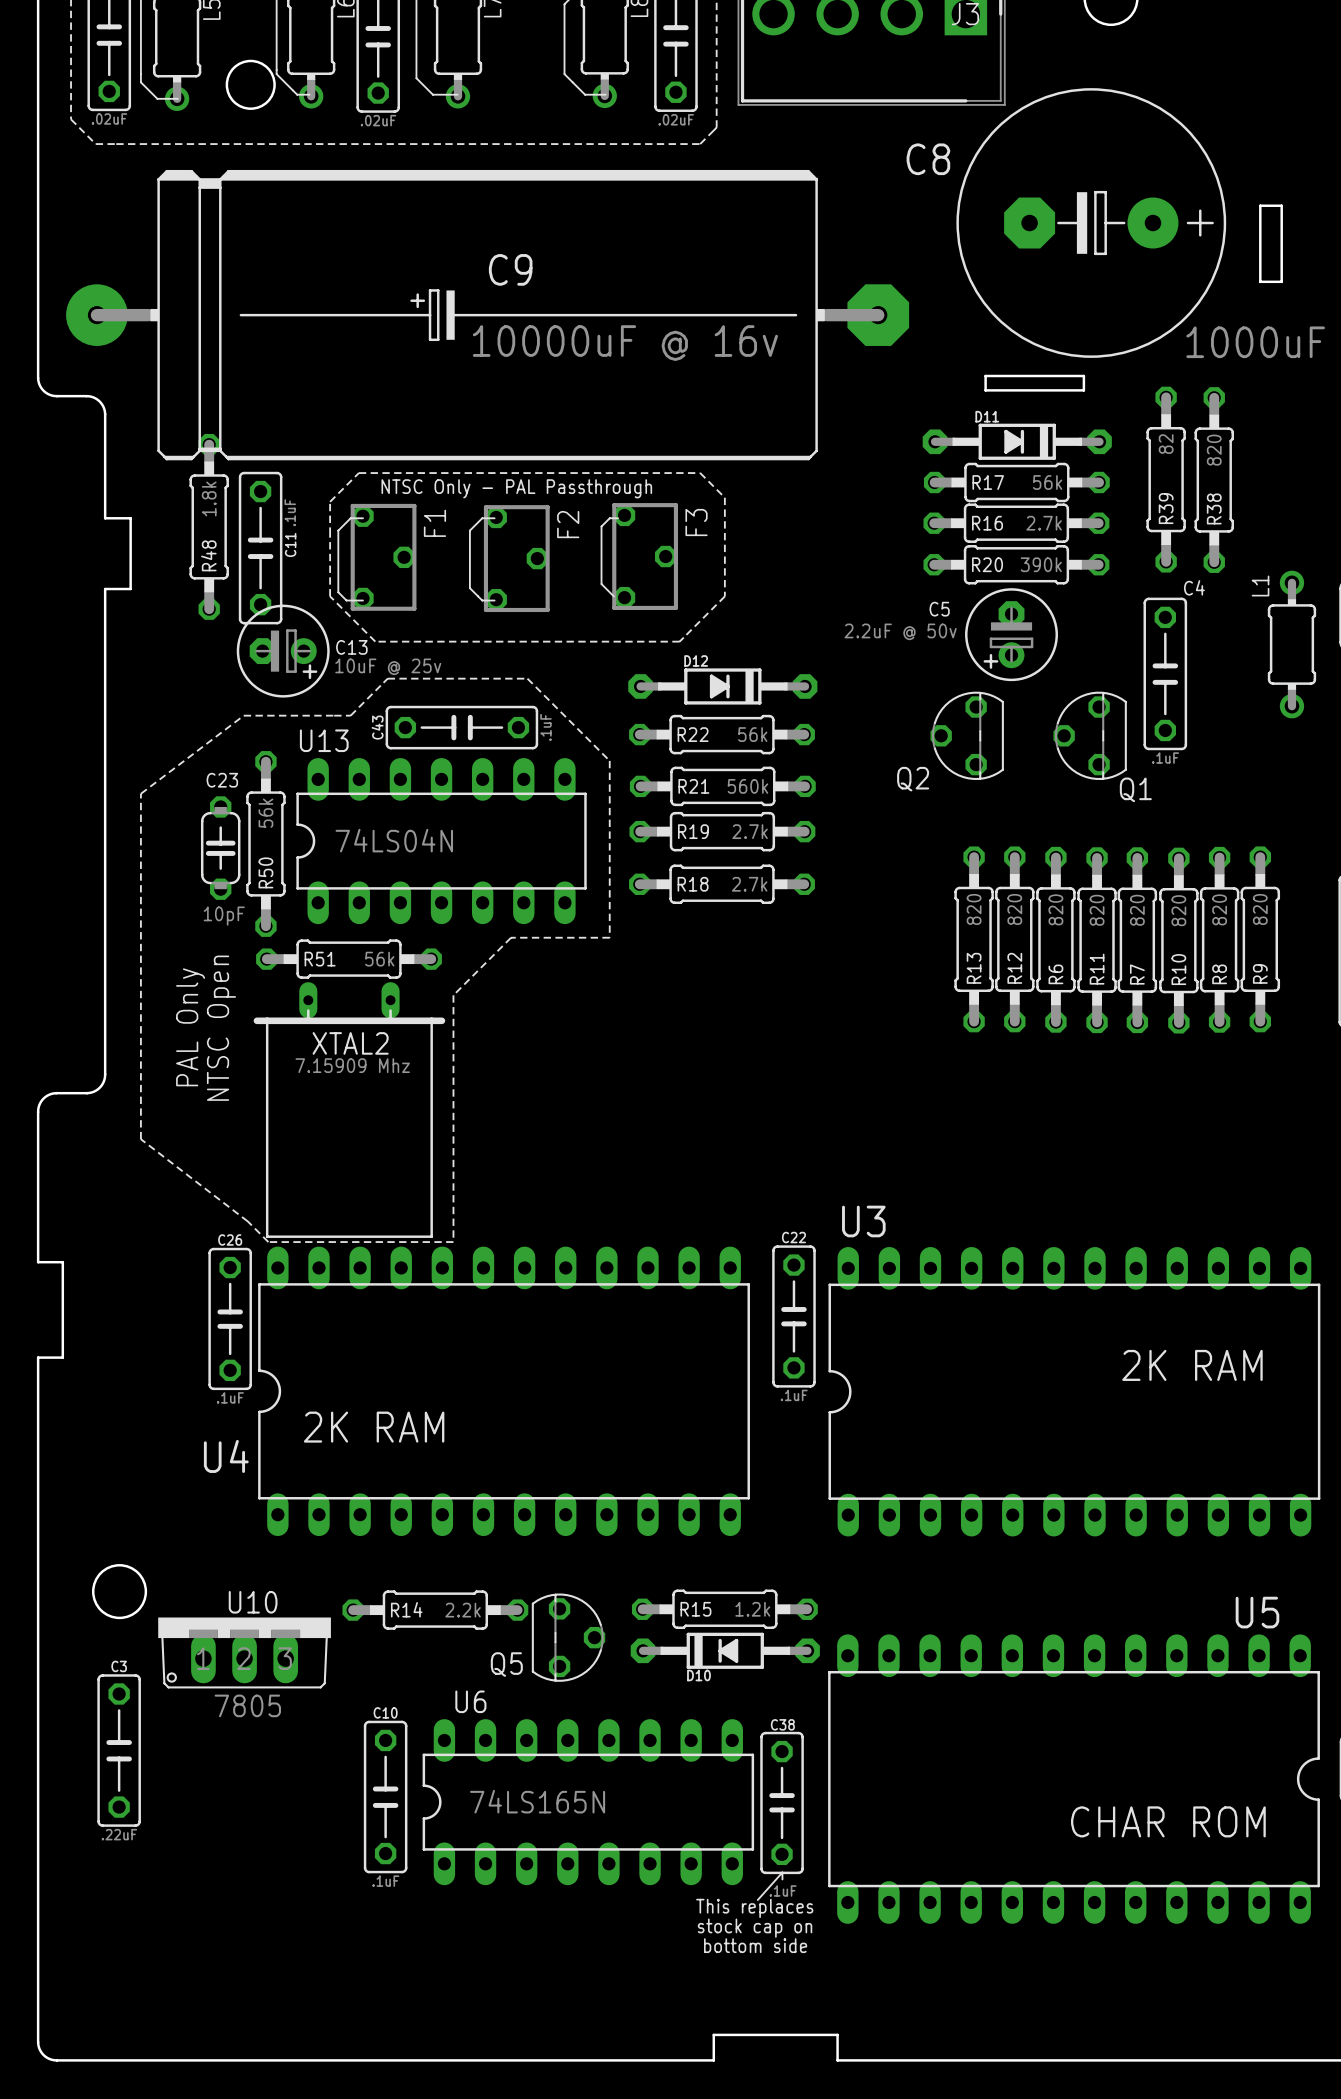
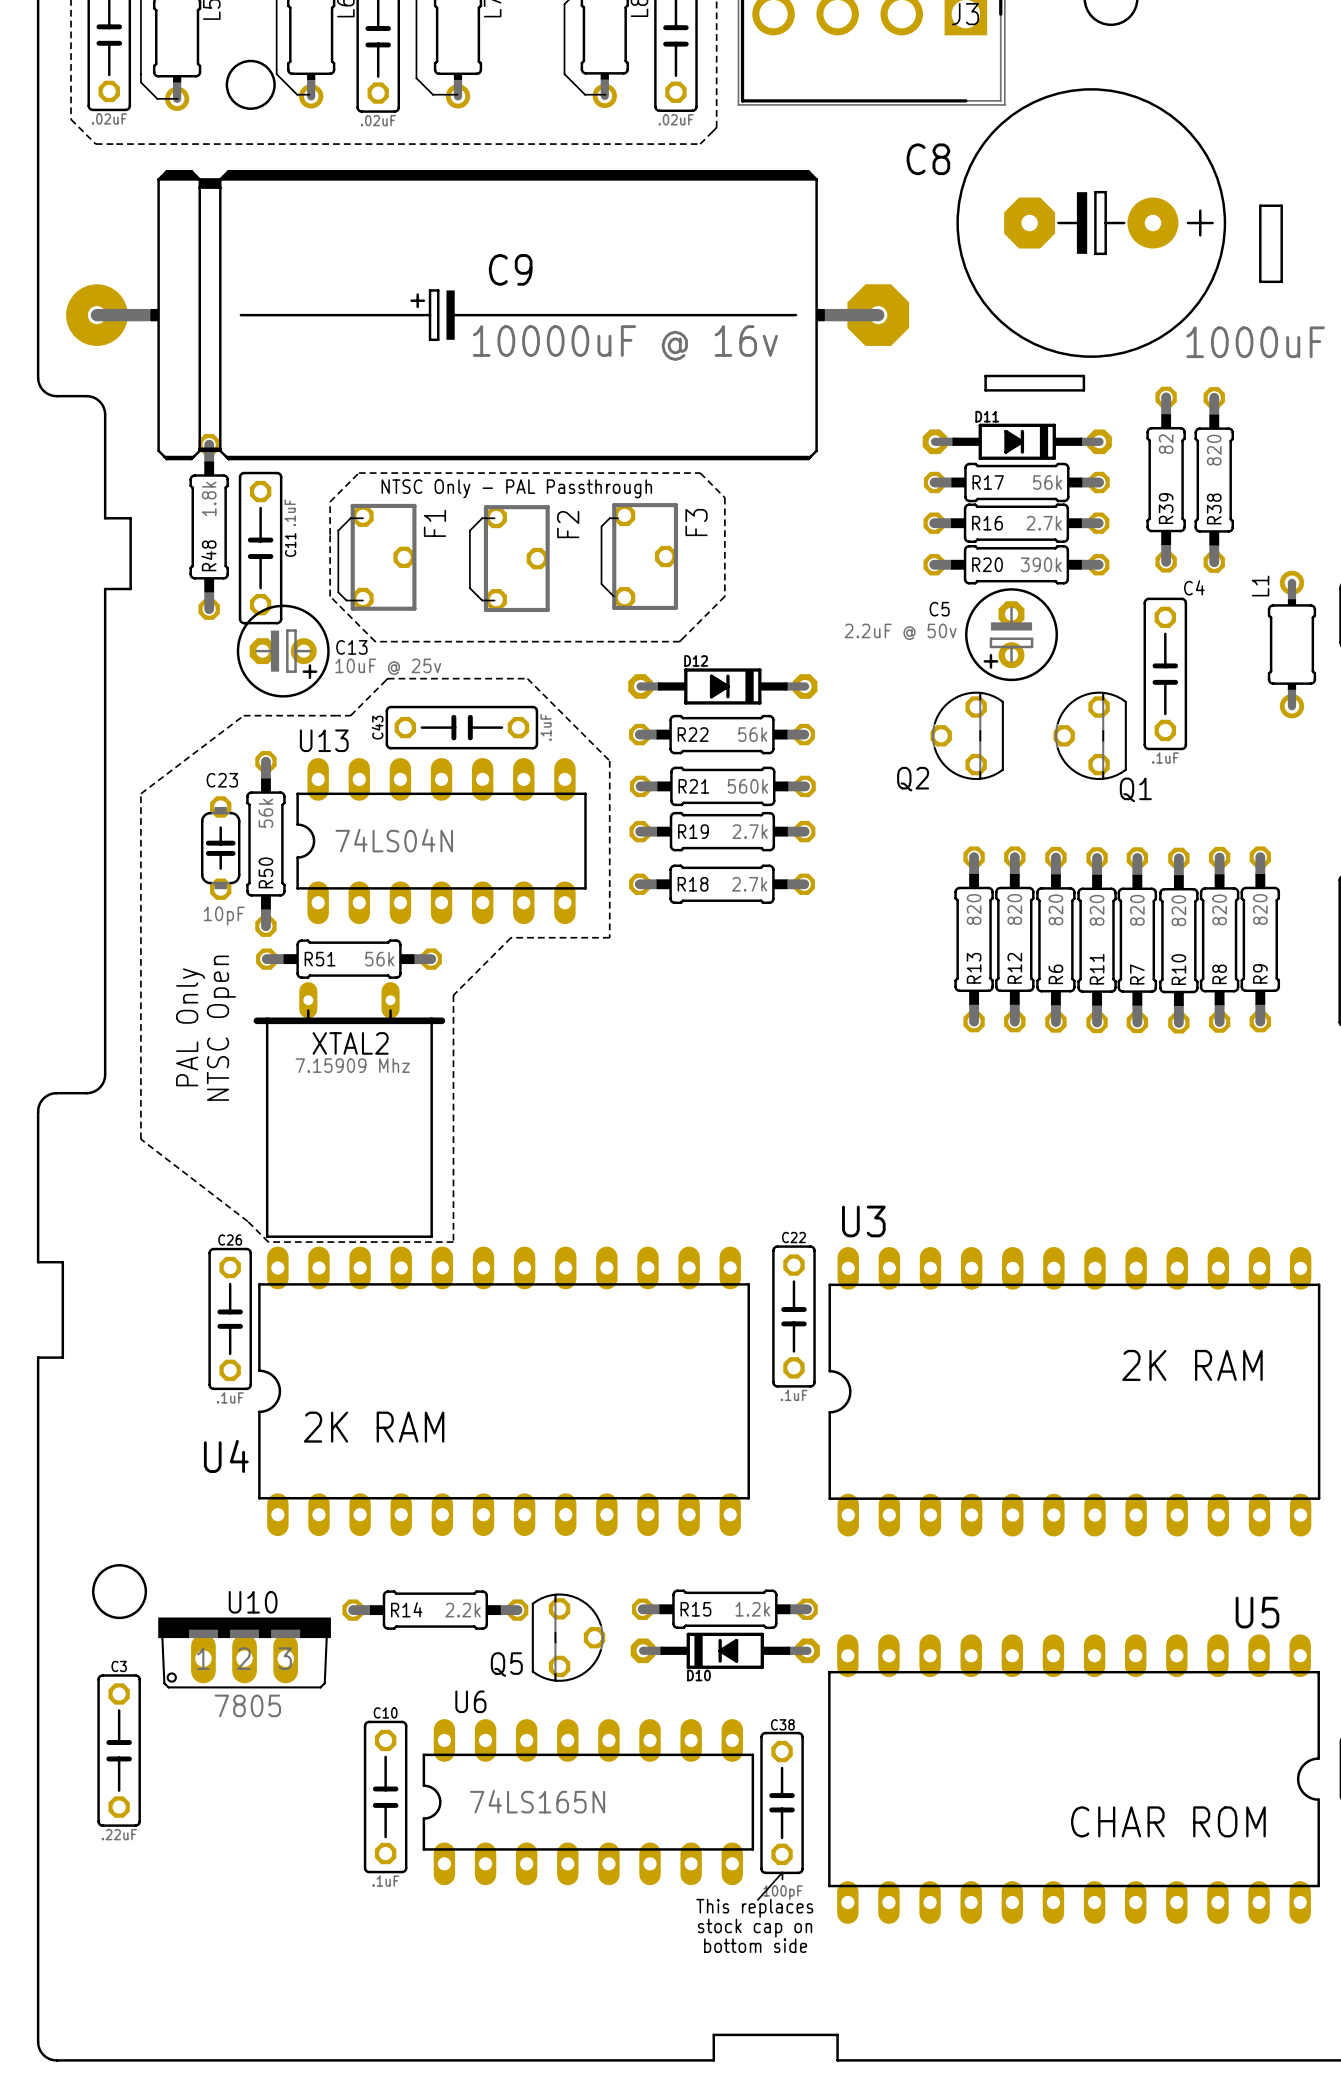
C38 value: .1uF (783, 1890) -> 100pF (783, 1892)

